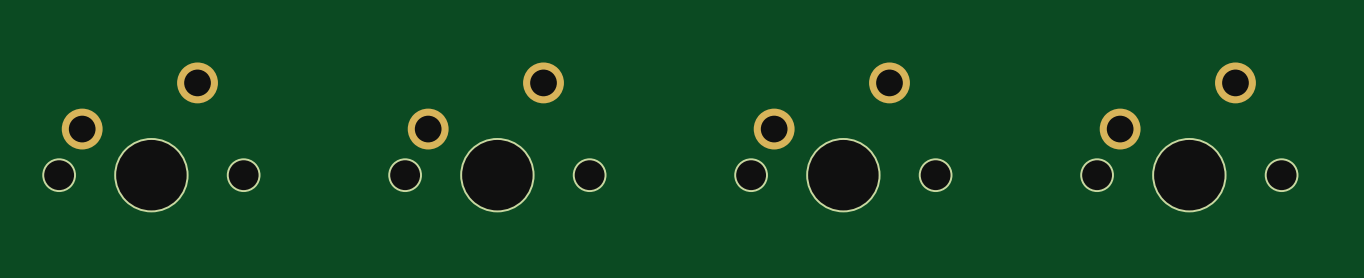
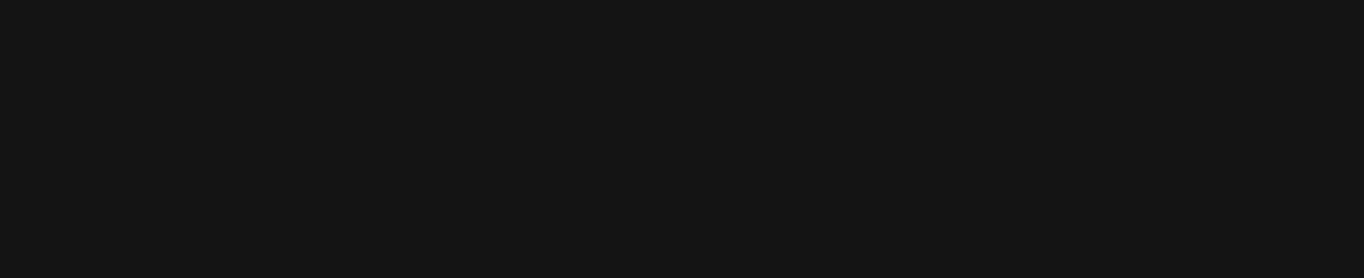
part: (151, 136) -> none
part: (497, 136) -> none
part: (843, 136) -> none
part: (1189, 136) -> none

